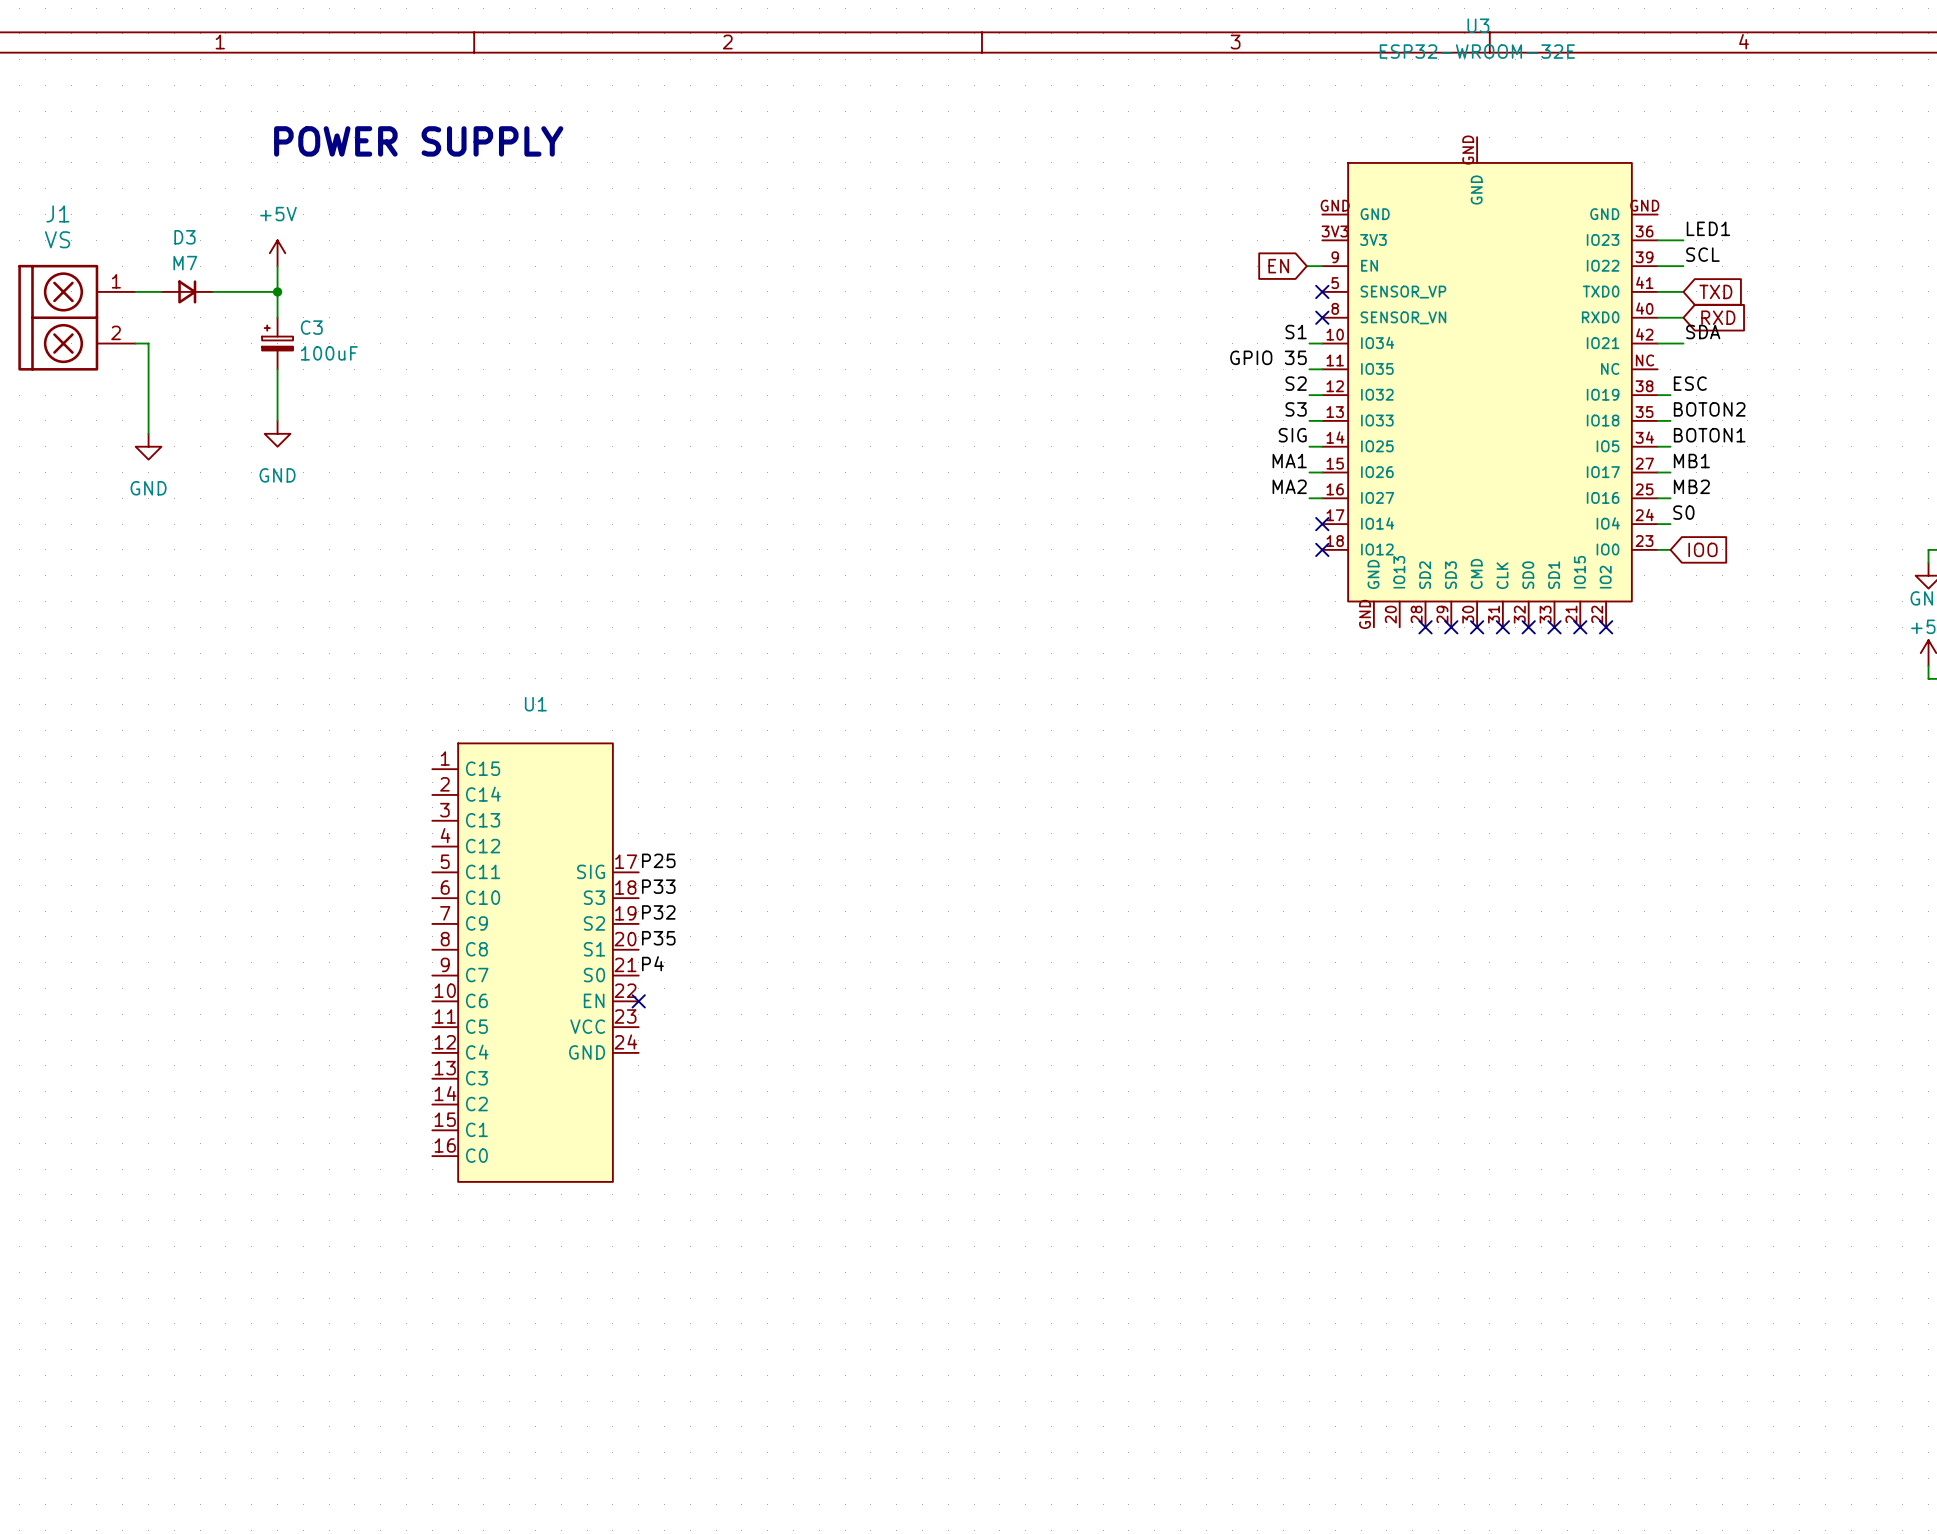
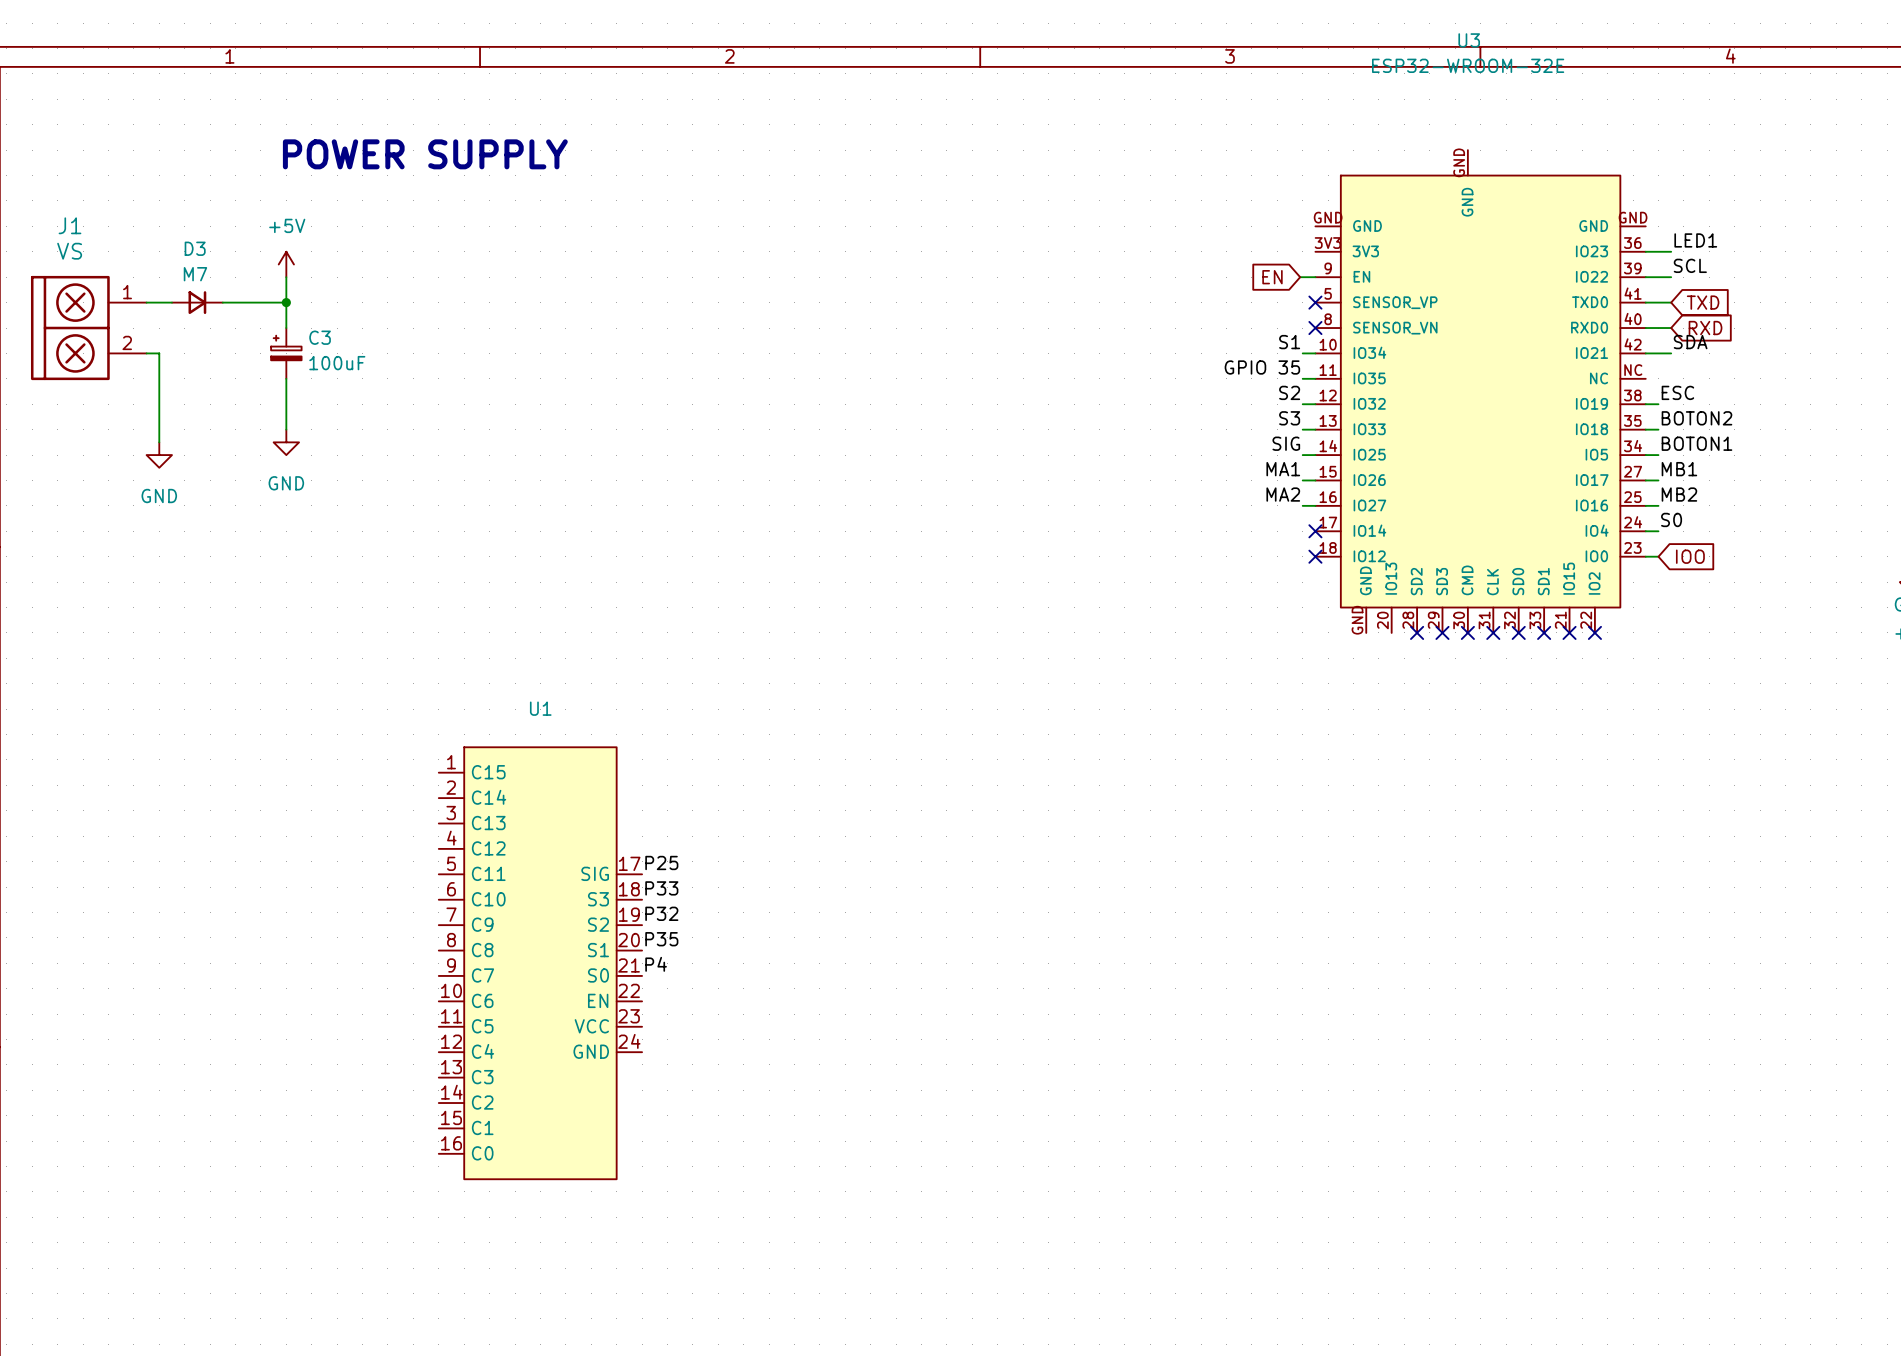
no-connect mark: (638, 1001) -> none

